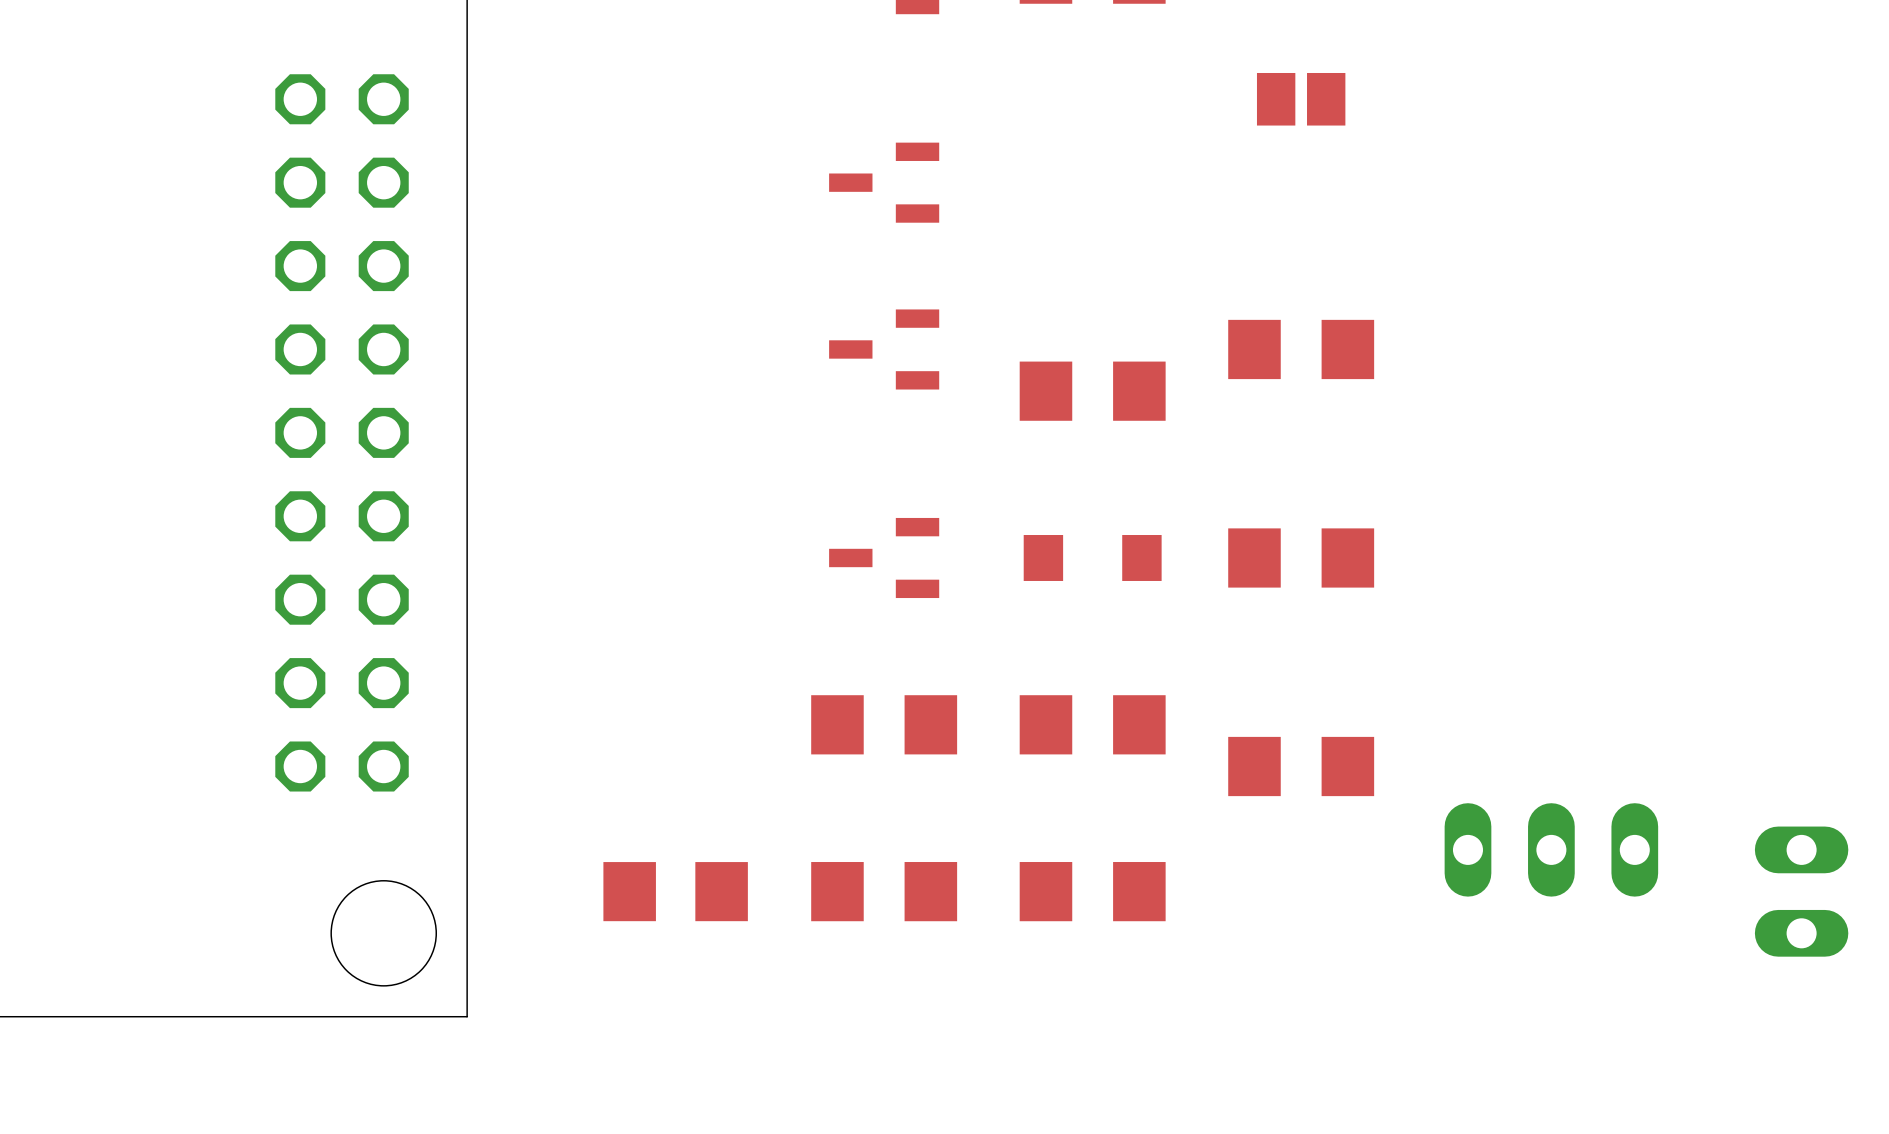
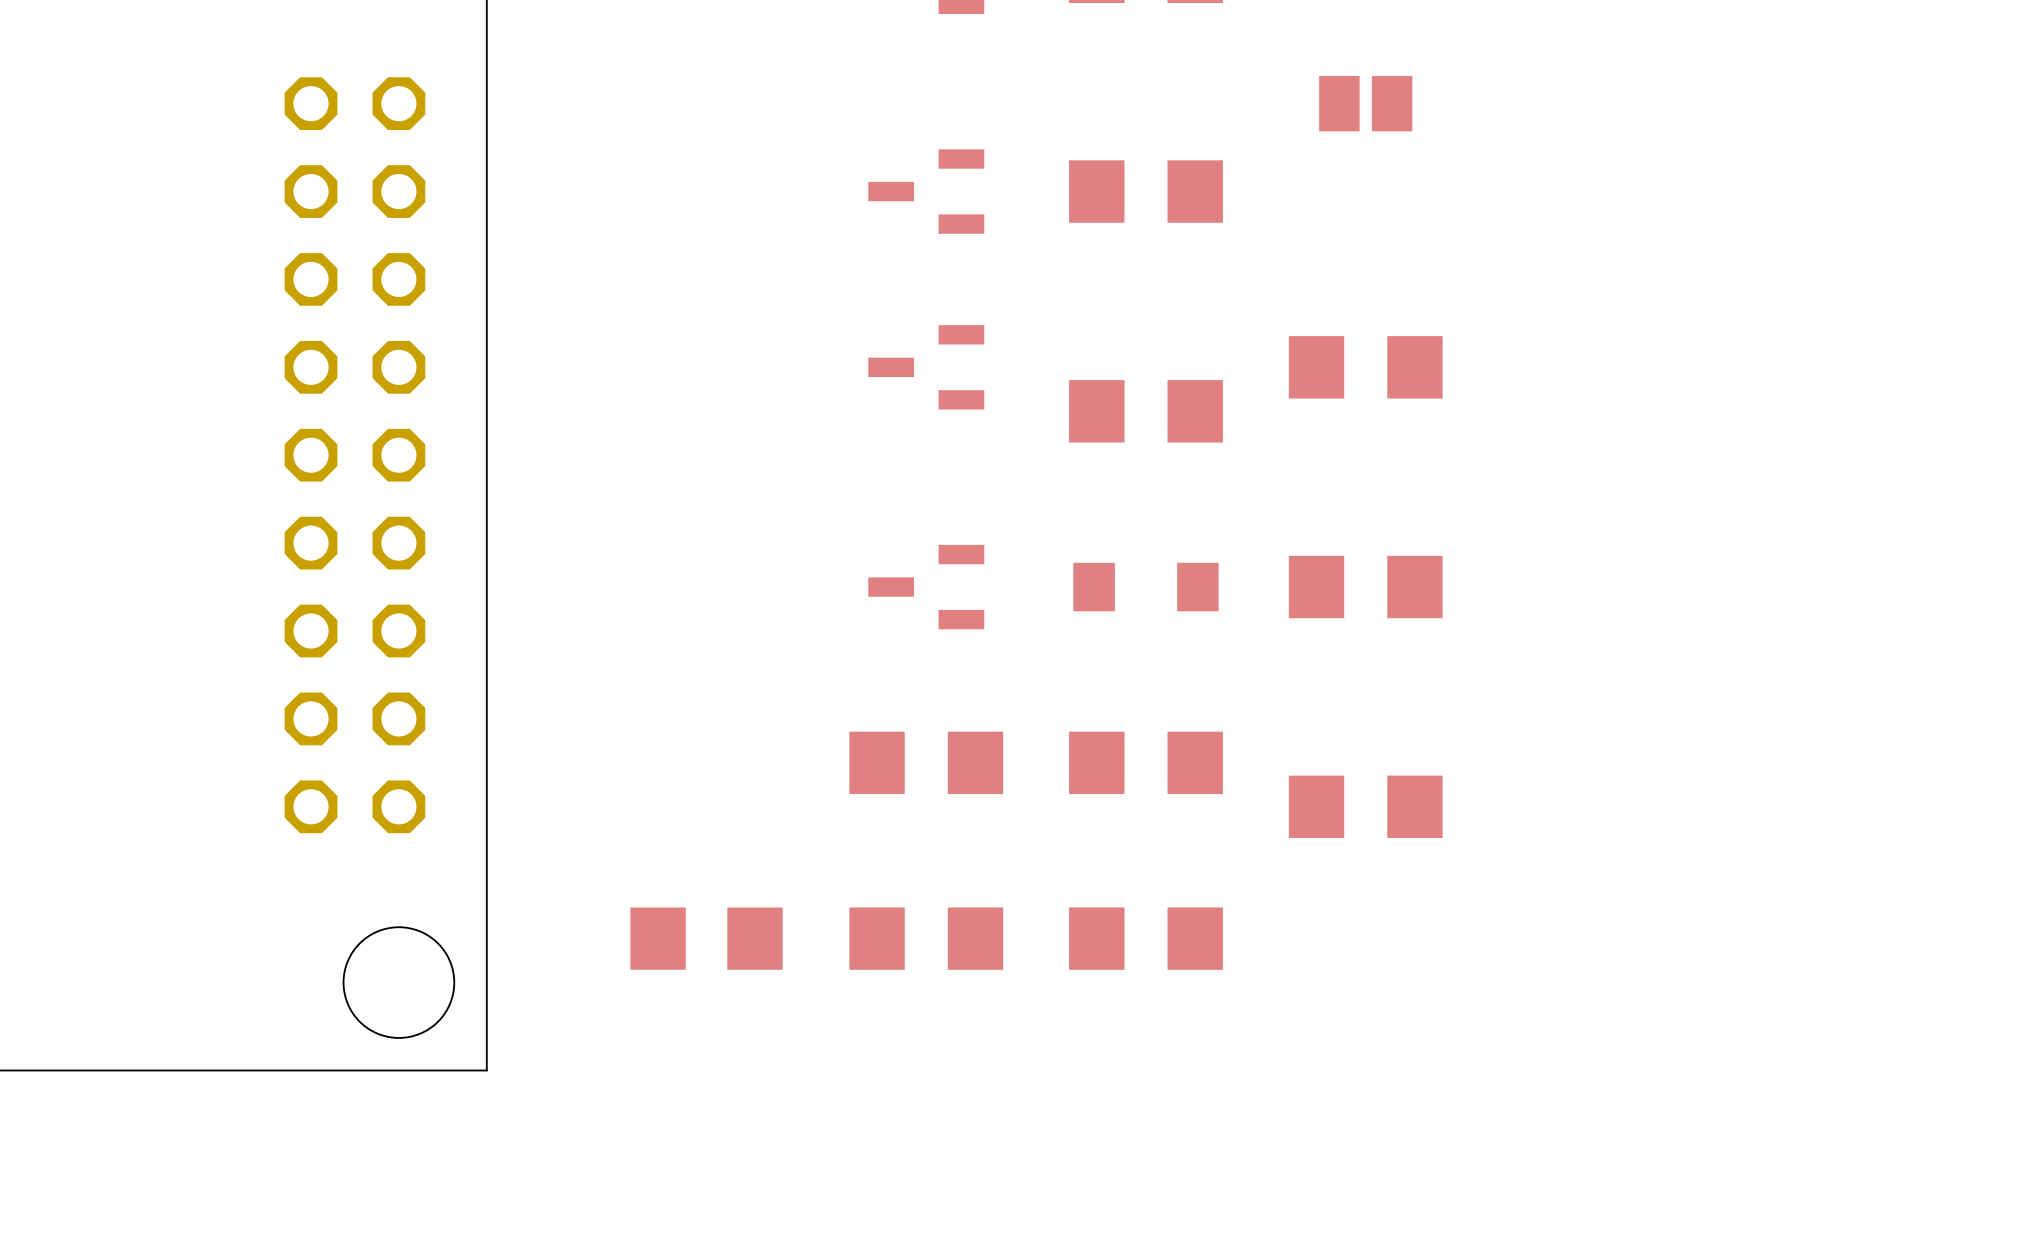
part: none -> (1146, 191)
part: (1551, 849) -> none
part: (1801, 891) -> none

